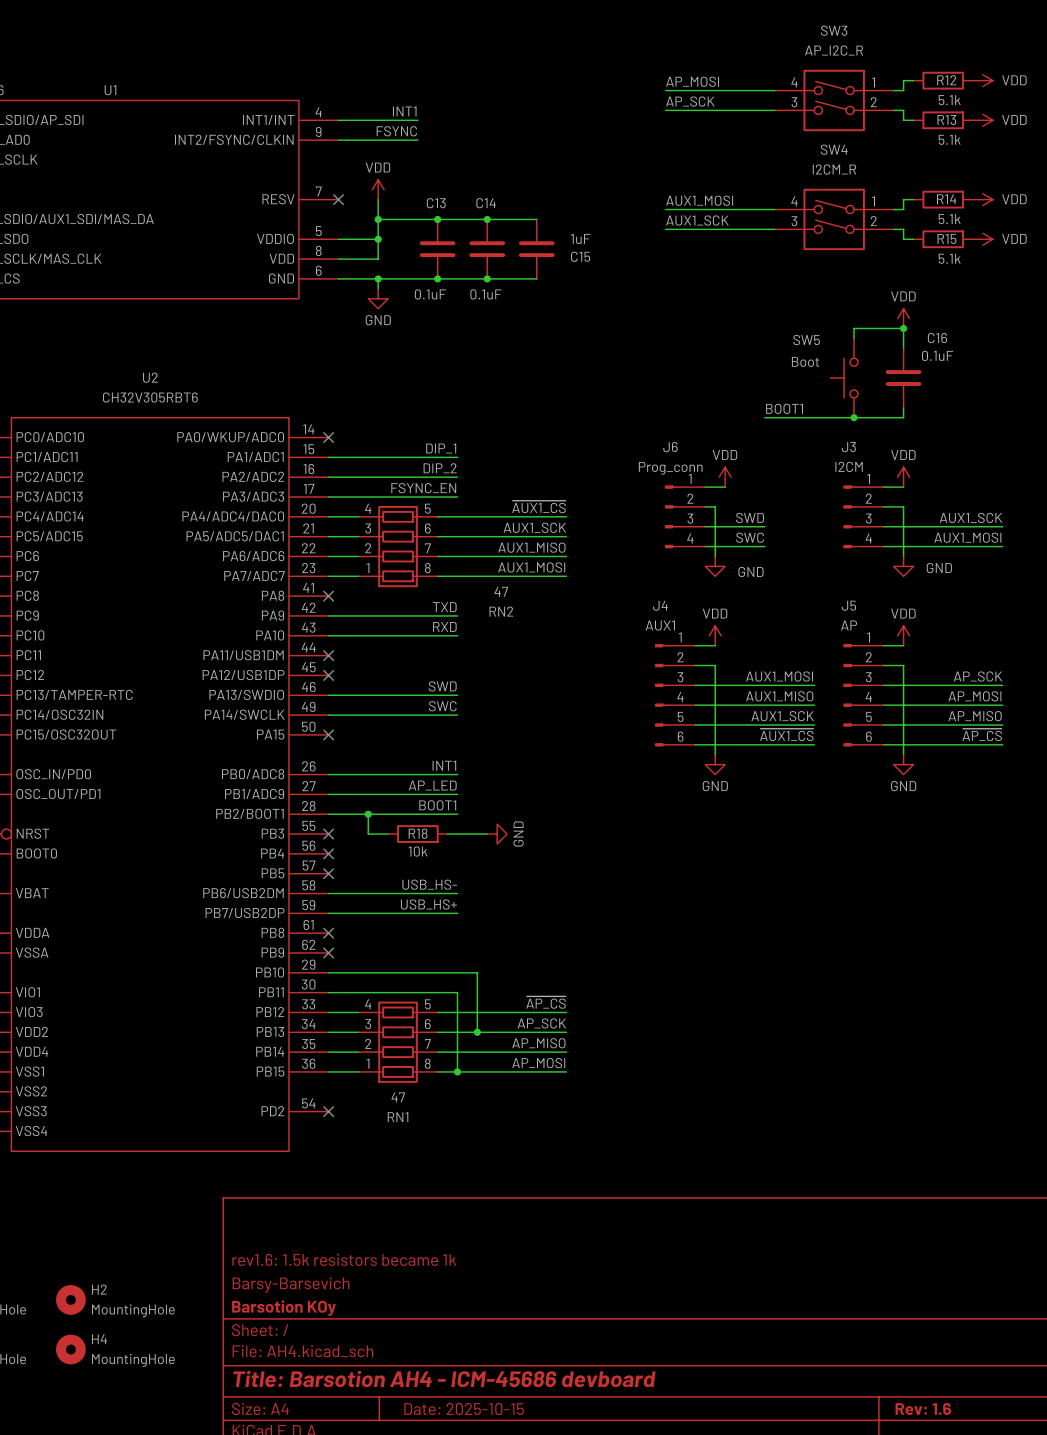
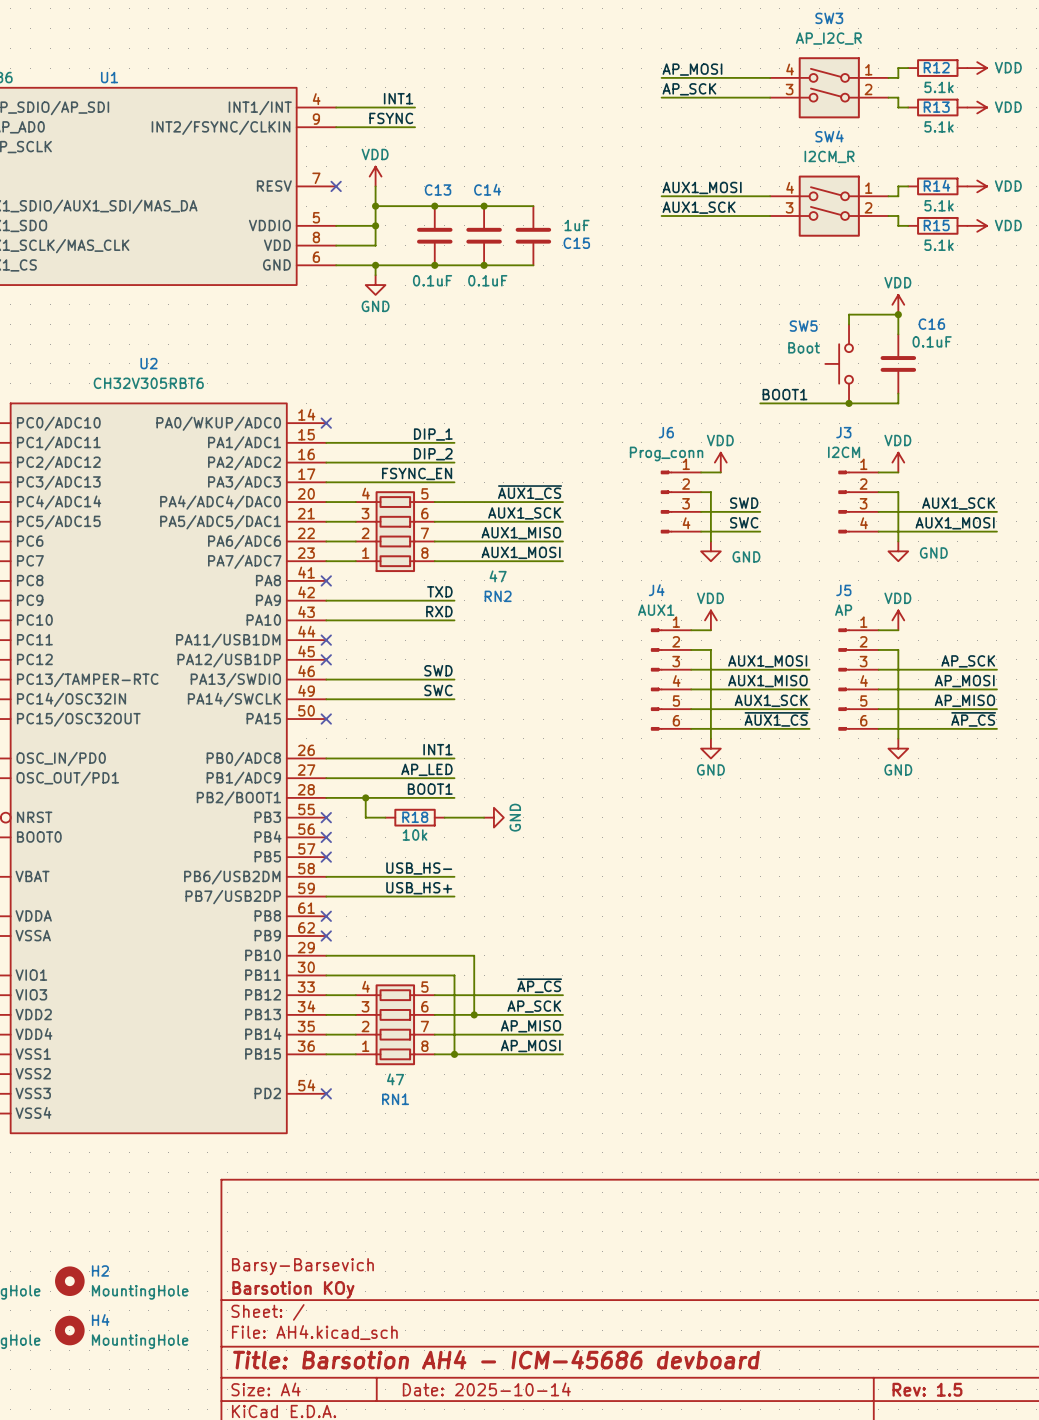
title block: rev1.6: 1.5k resistors became 1k (344, 1259) -> none
title block: Date: 2025-10-15 (464, 1409) -> Date: 2025-10-14 (486, 1389)
title block: Rev: 1.6 (923, 1409) -> Rev: 1.5 (927, 1389)

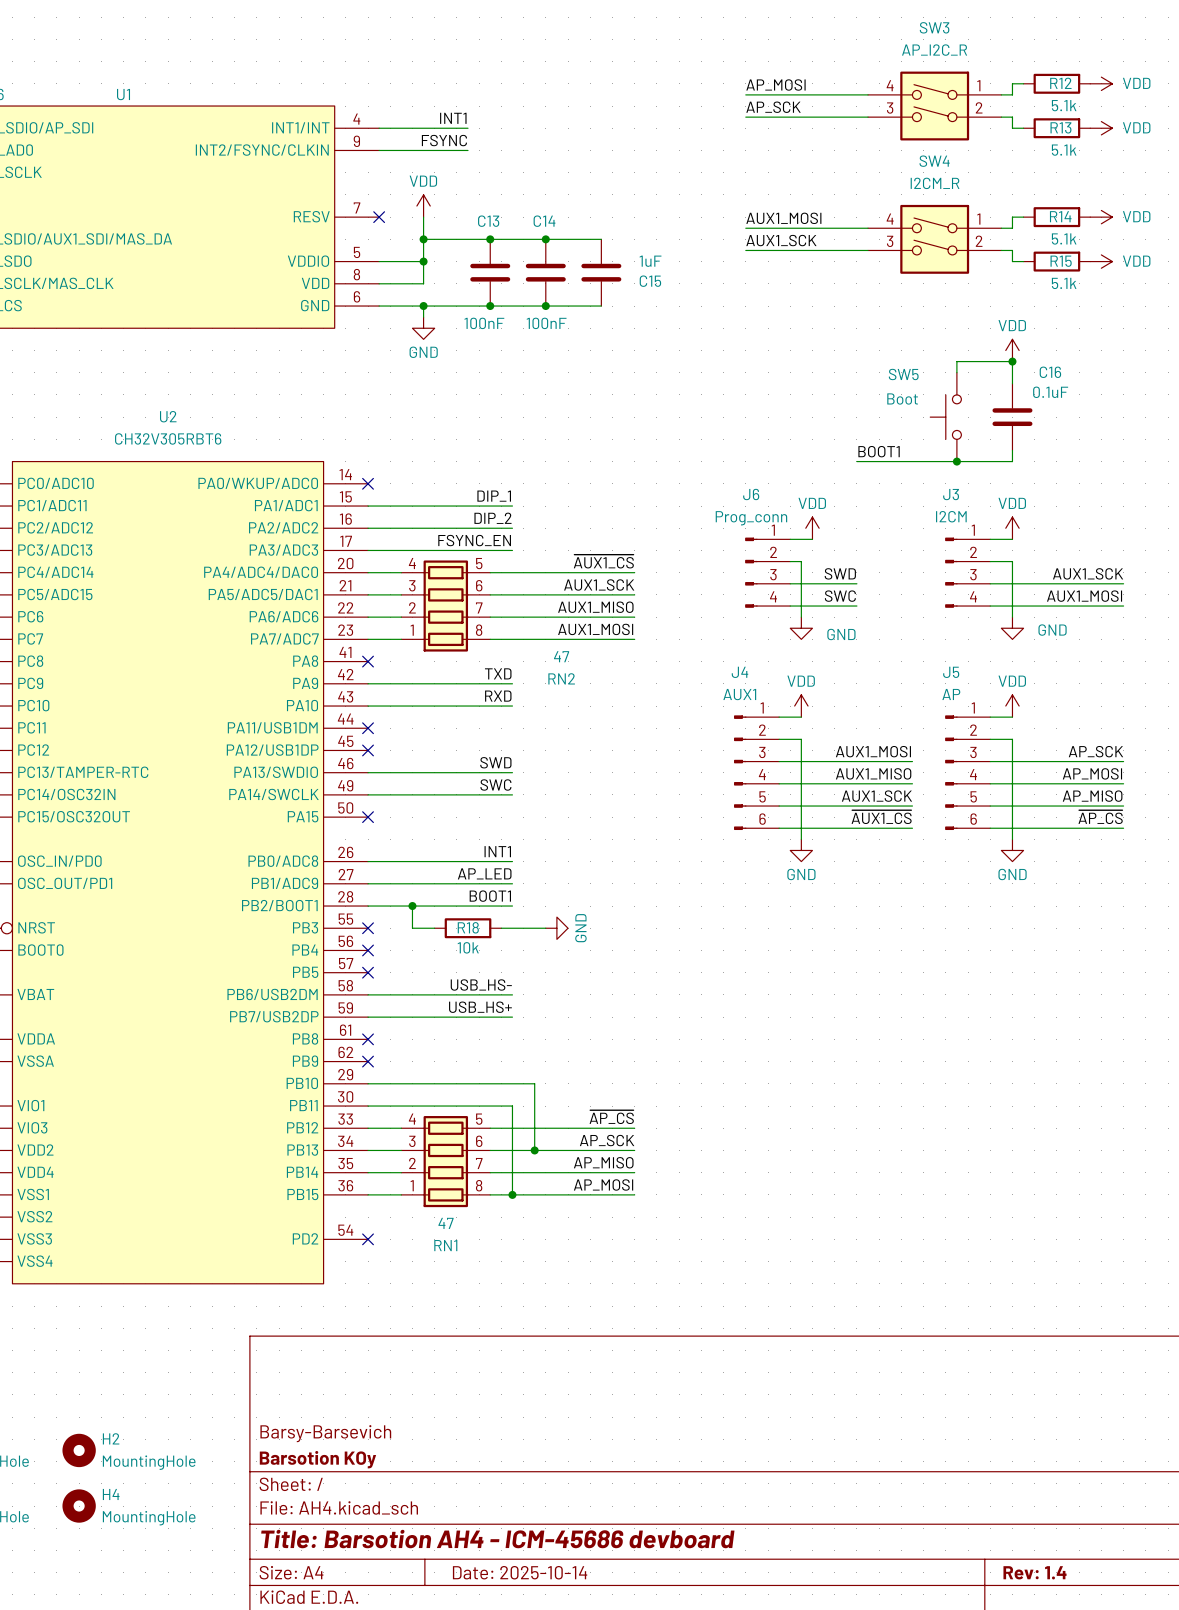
C13 value: 0.1uF (432, 280) -> 100nF (484, 323)
C14 value: 0.1uF (487, 280) -> 100nF (546, 323)
title block: Rev: 1.5 (927, 1389) -> Rev: 1.4 (1035, 1572)

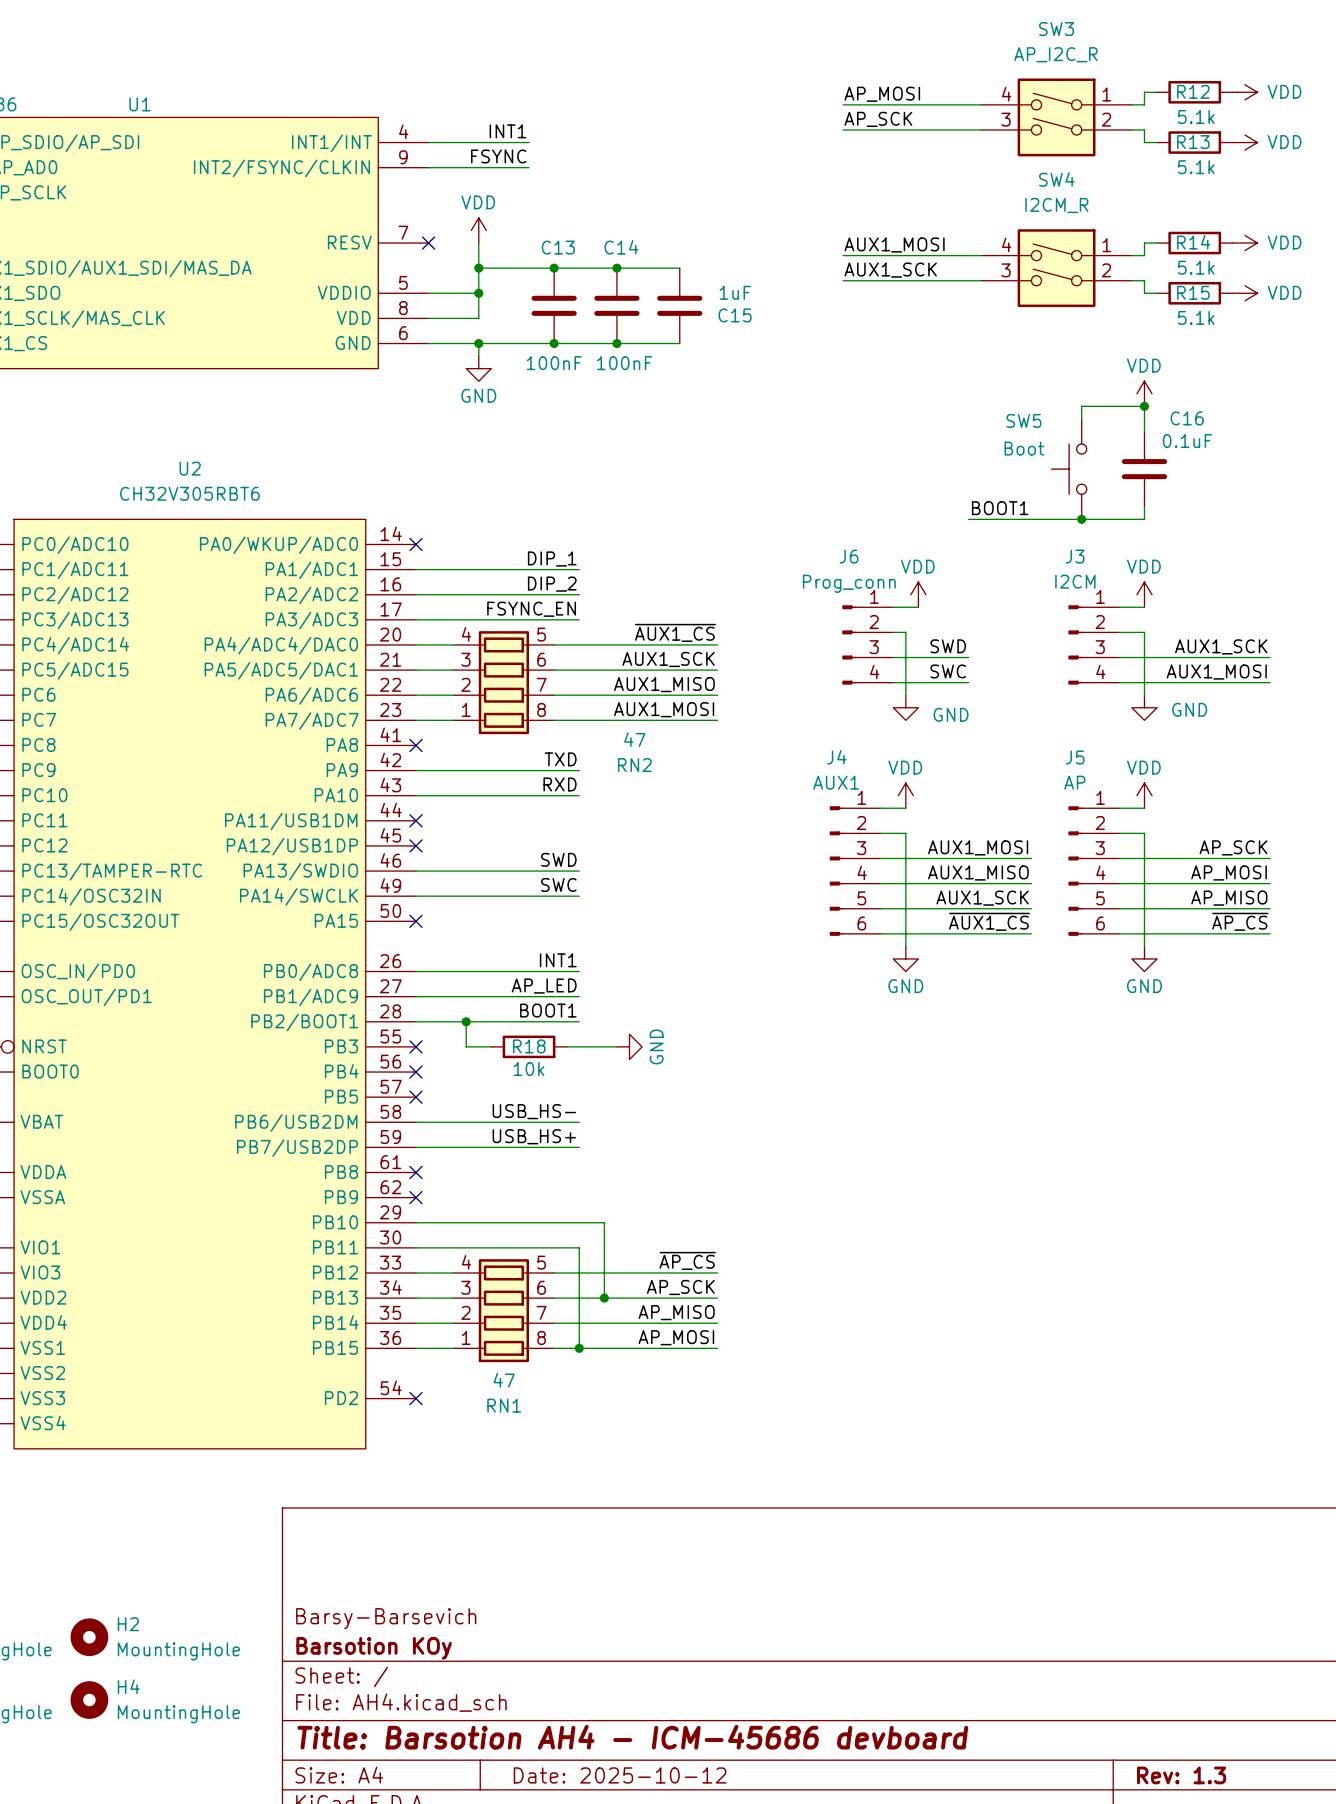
title block: Date: 2025-10-14 (520, 1572) -> Date: 2025-10-12 (620, 1775)
title block: Rev: 1.4 (1035, 1572) -> Rev: 1.3 (1181, 1775)

